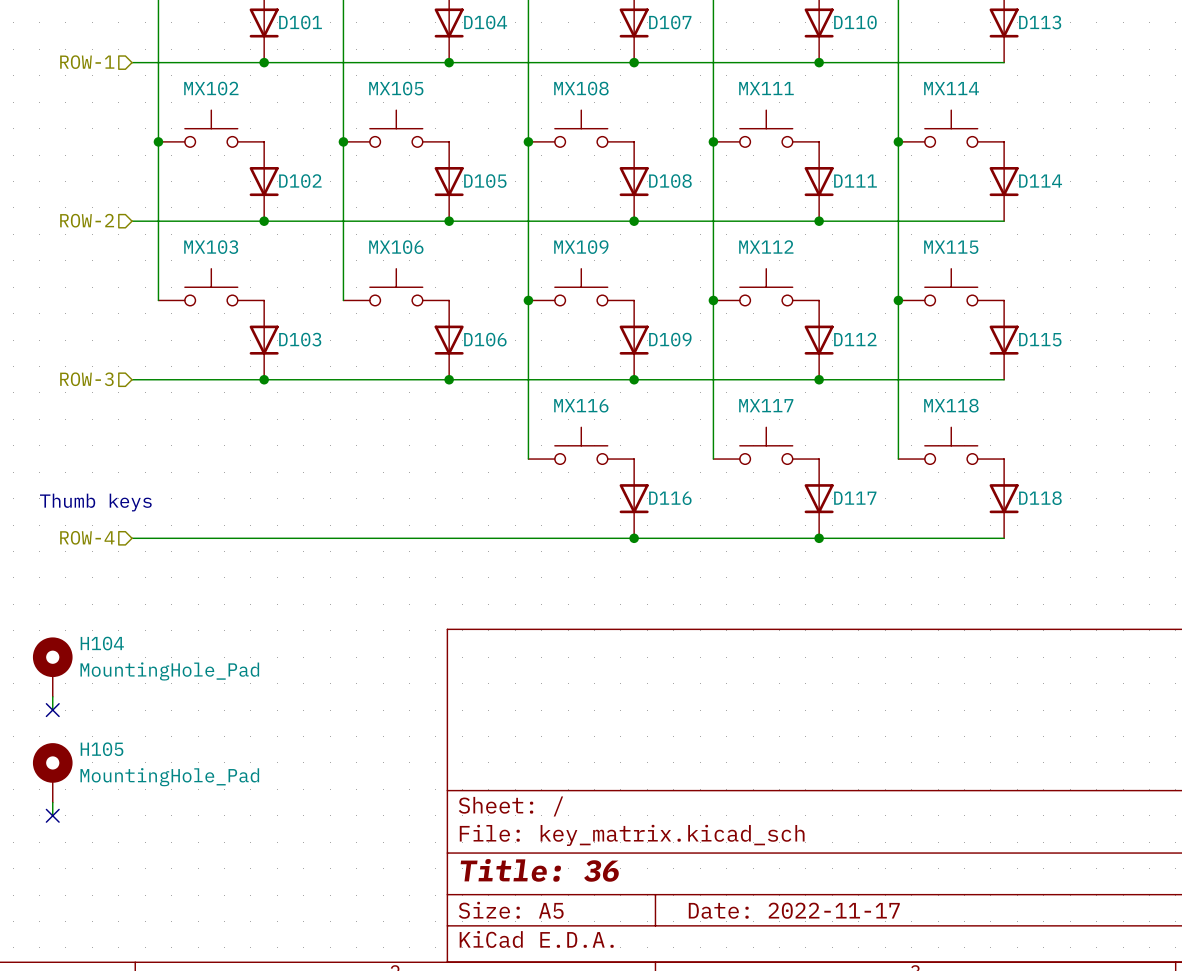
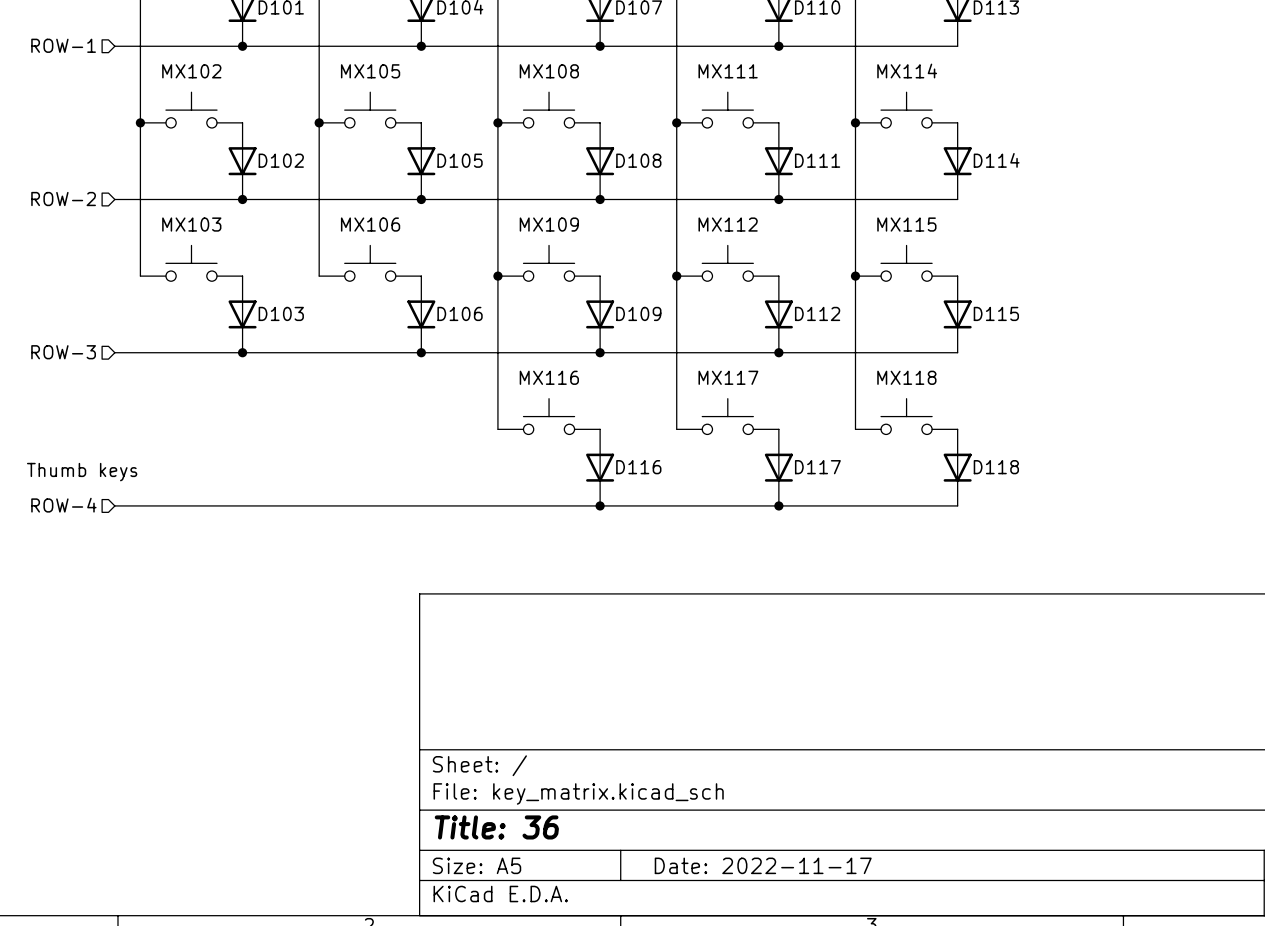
H104: MountingHole_Pad (52, 667) -> none
wire: (52, 696) (52, 710) -> none
no-connect mark: (52, 710) -> none
H105: MountingHole_Pad (52, 772) -> none
wire: (52, 802) (52, 815) -> none
no-connect mark: (52, 815) -> none

